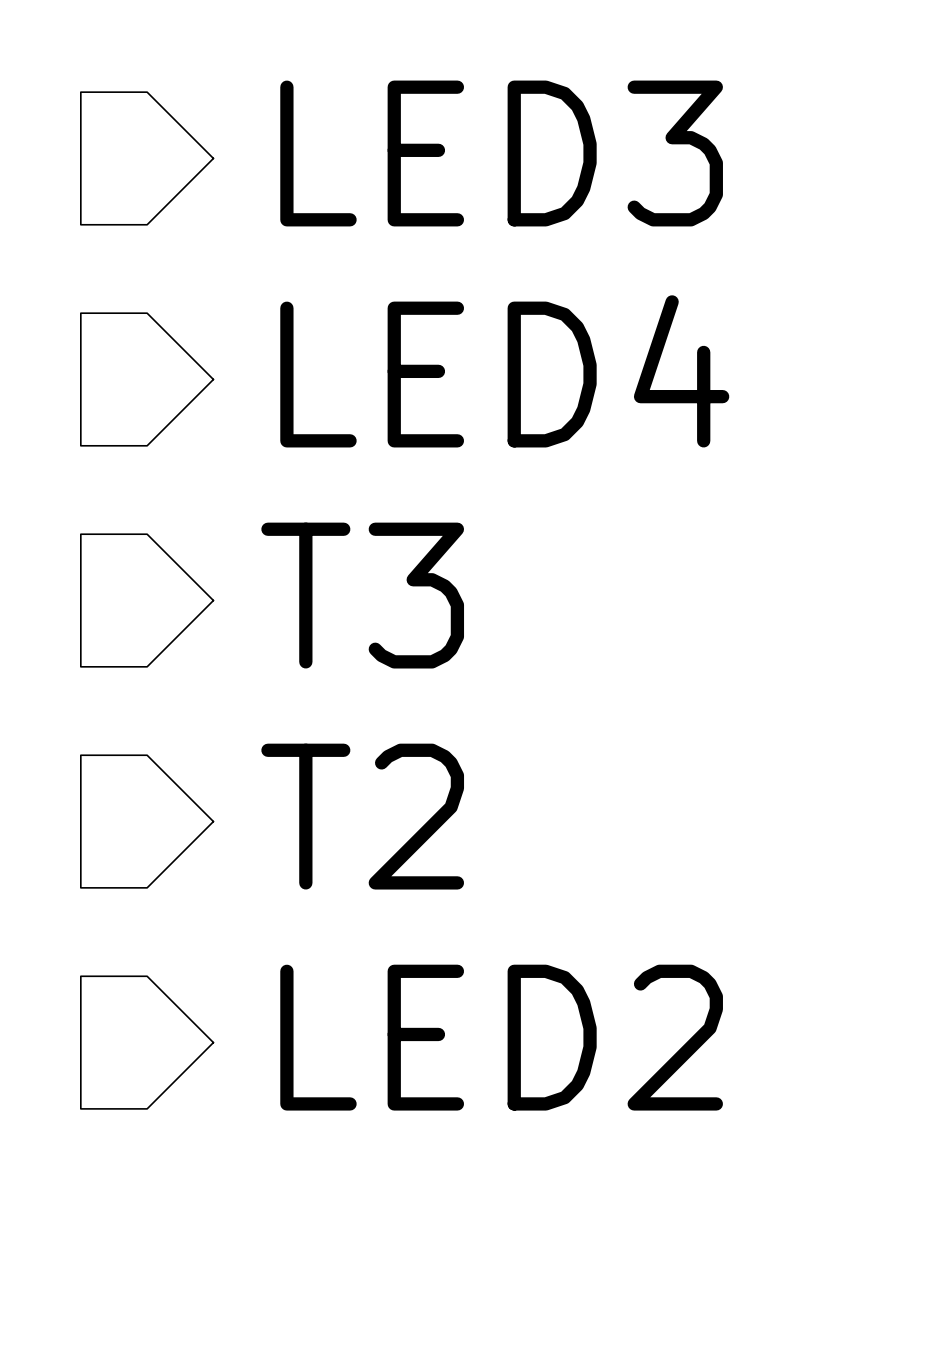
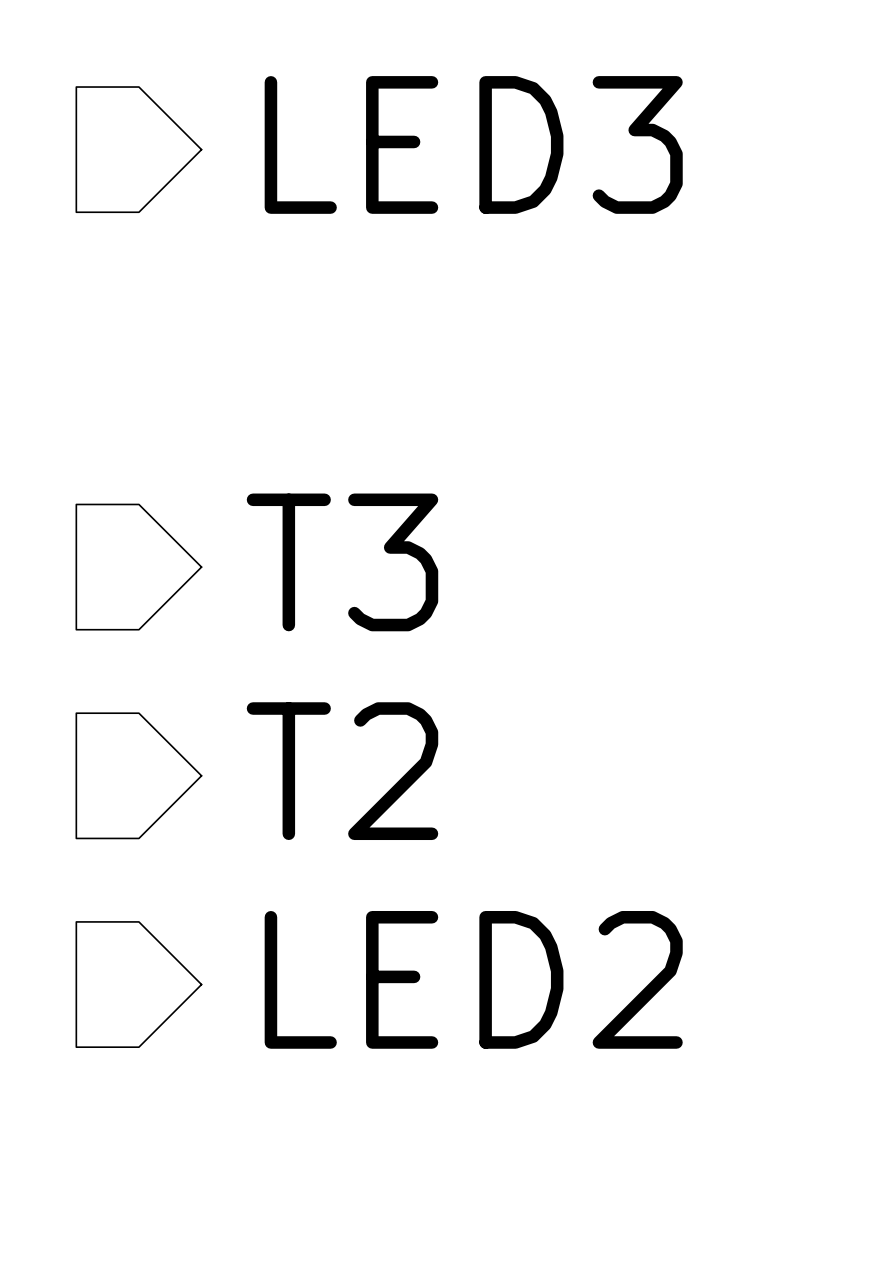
hierarchical label: LED4 (504, 371) -> none

